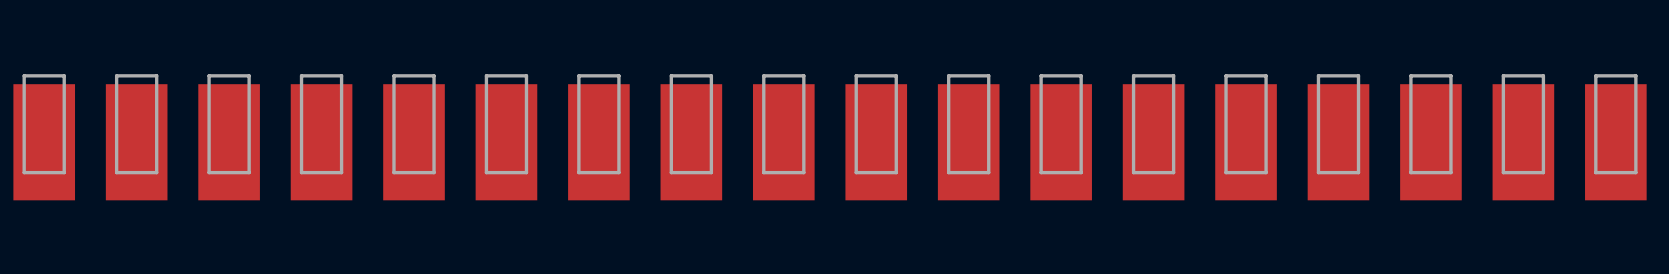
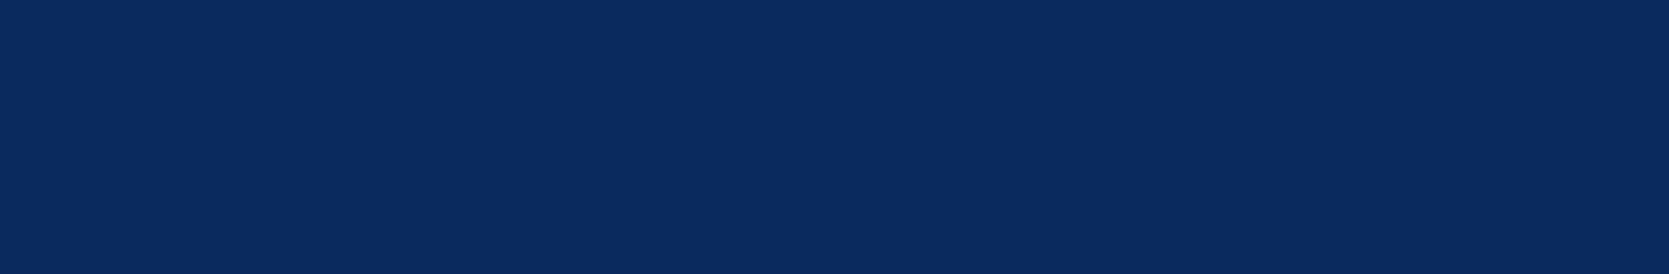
part: (830, 137) -> none

